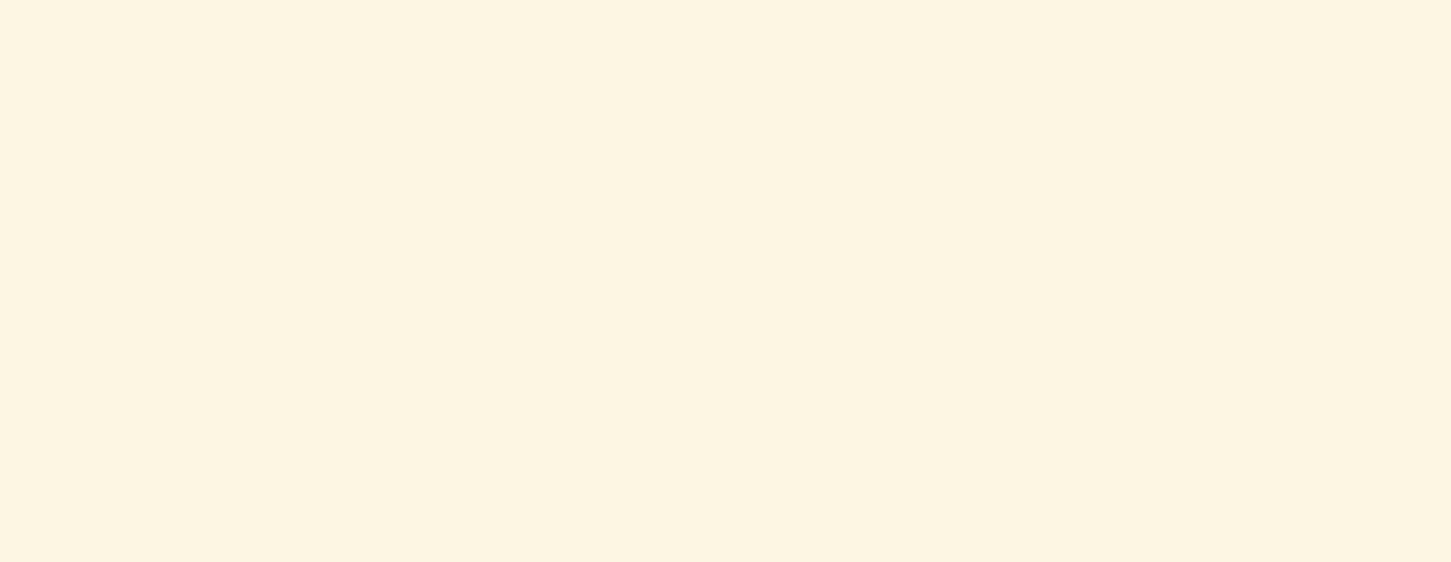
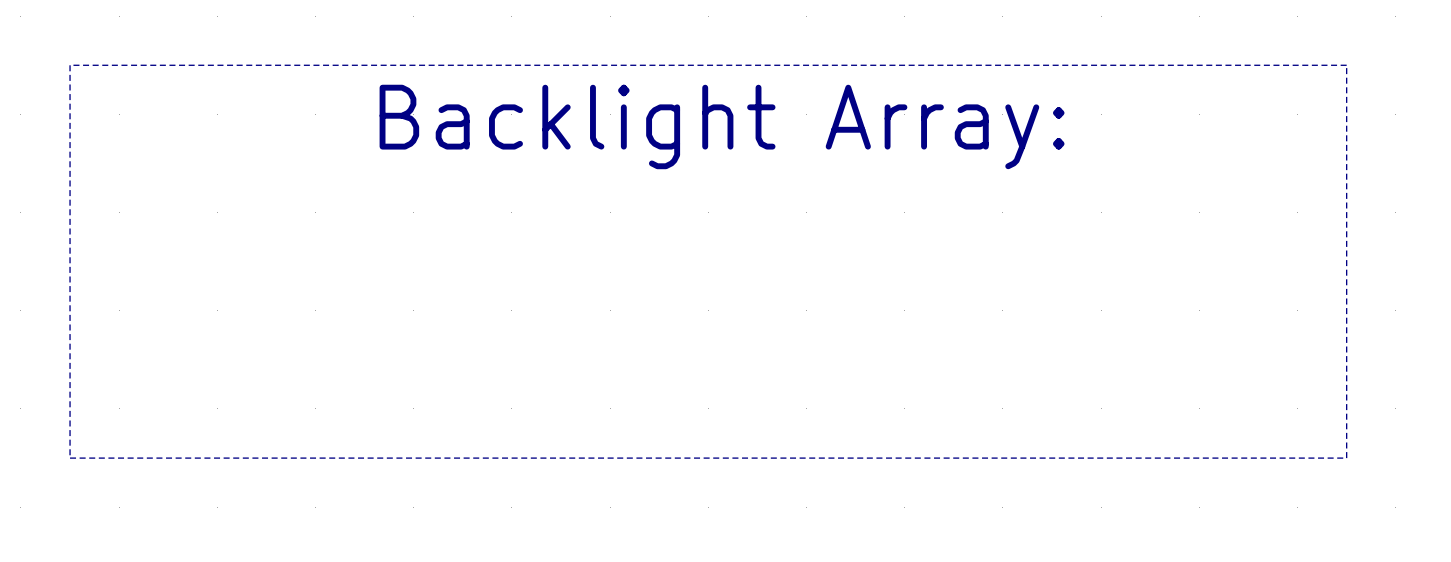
line: none -> (70, 65) (70, 458) (1346, 458) (1346, 65) (70, 65)
text: none -> Backlight Array: (722, 126)

